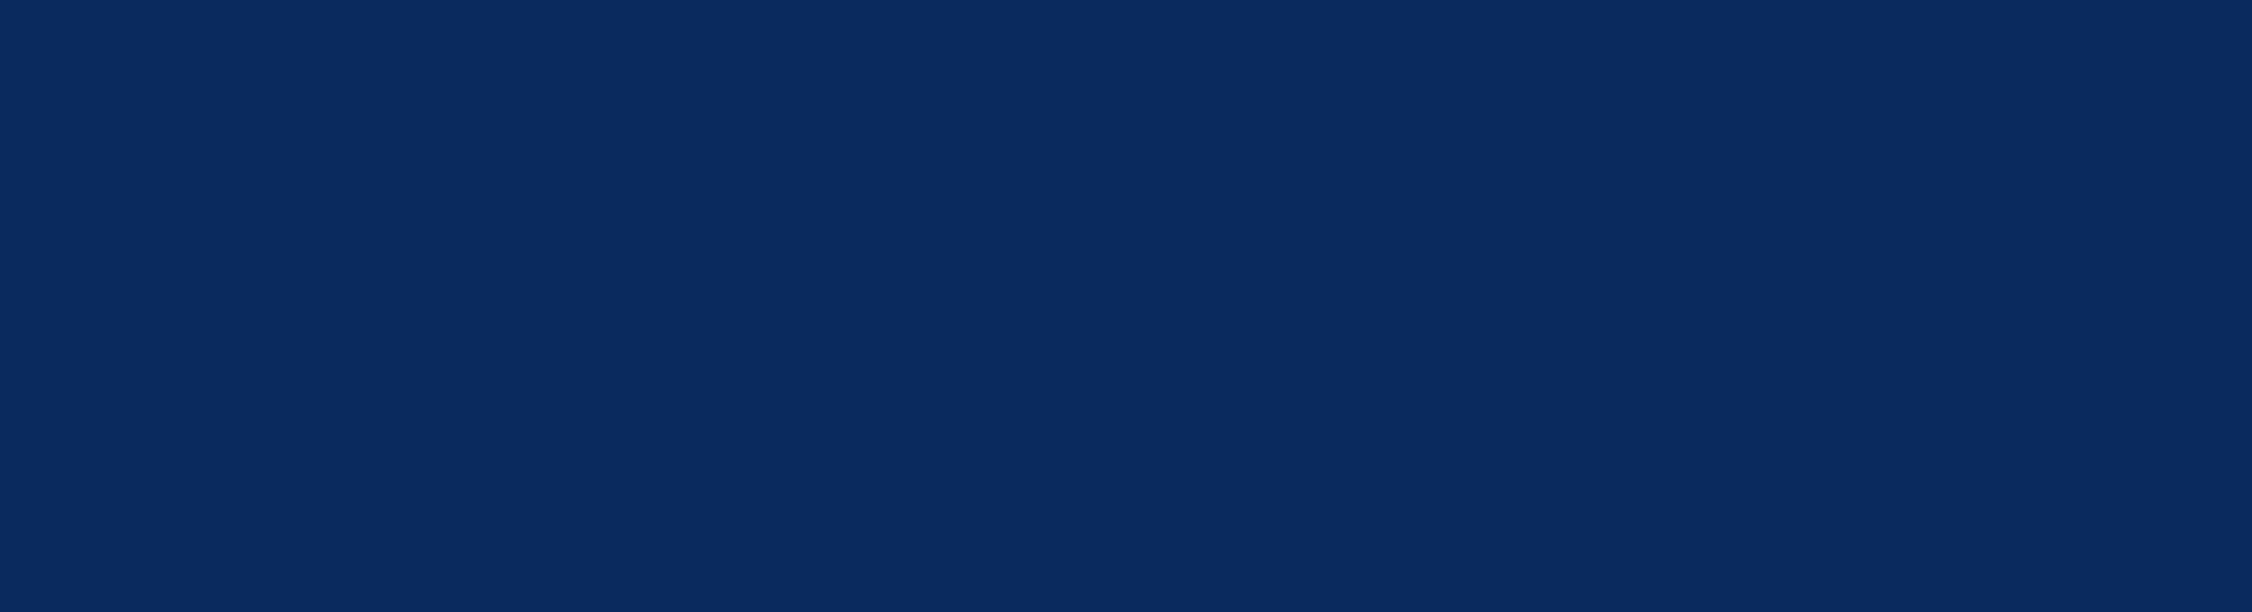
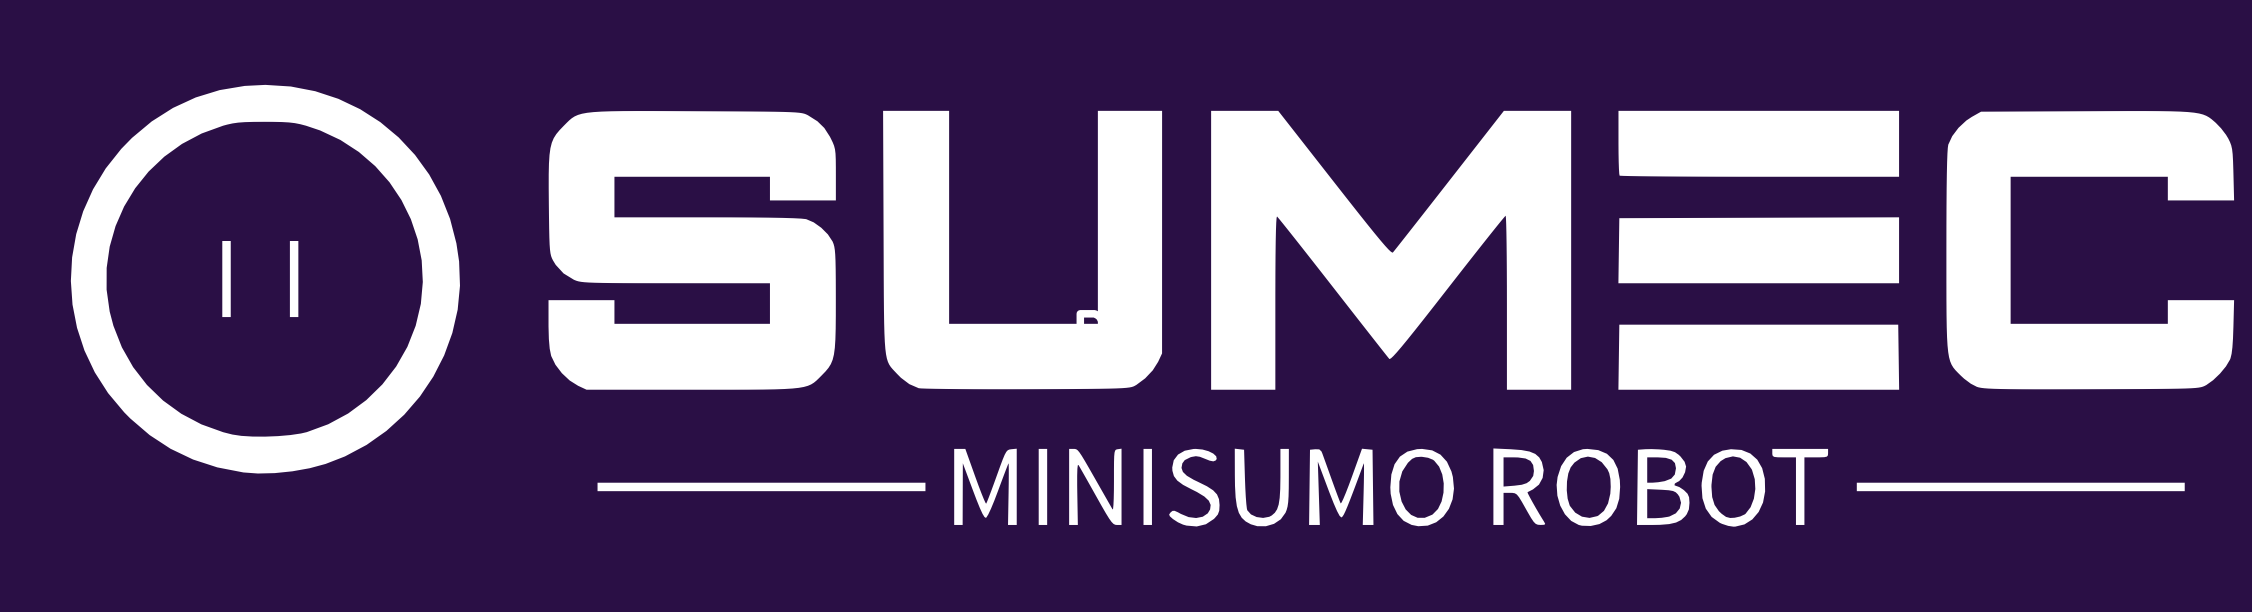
part: none -> (1152, 305)

